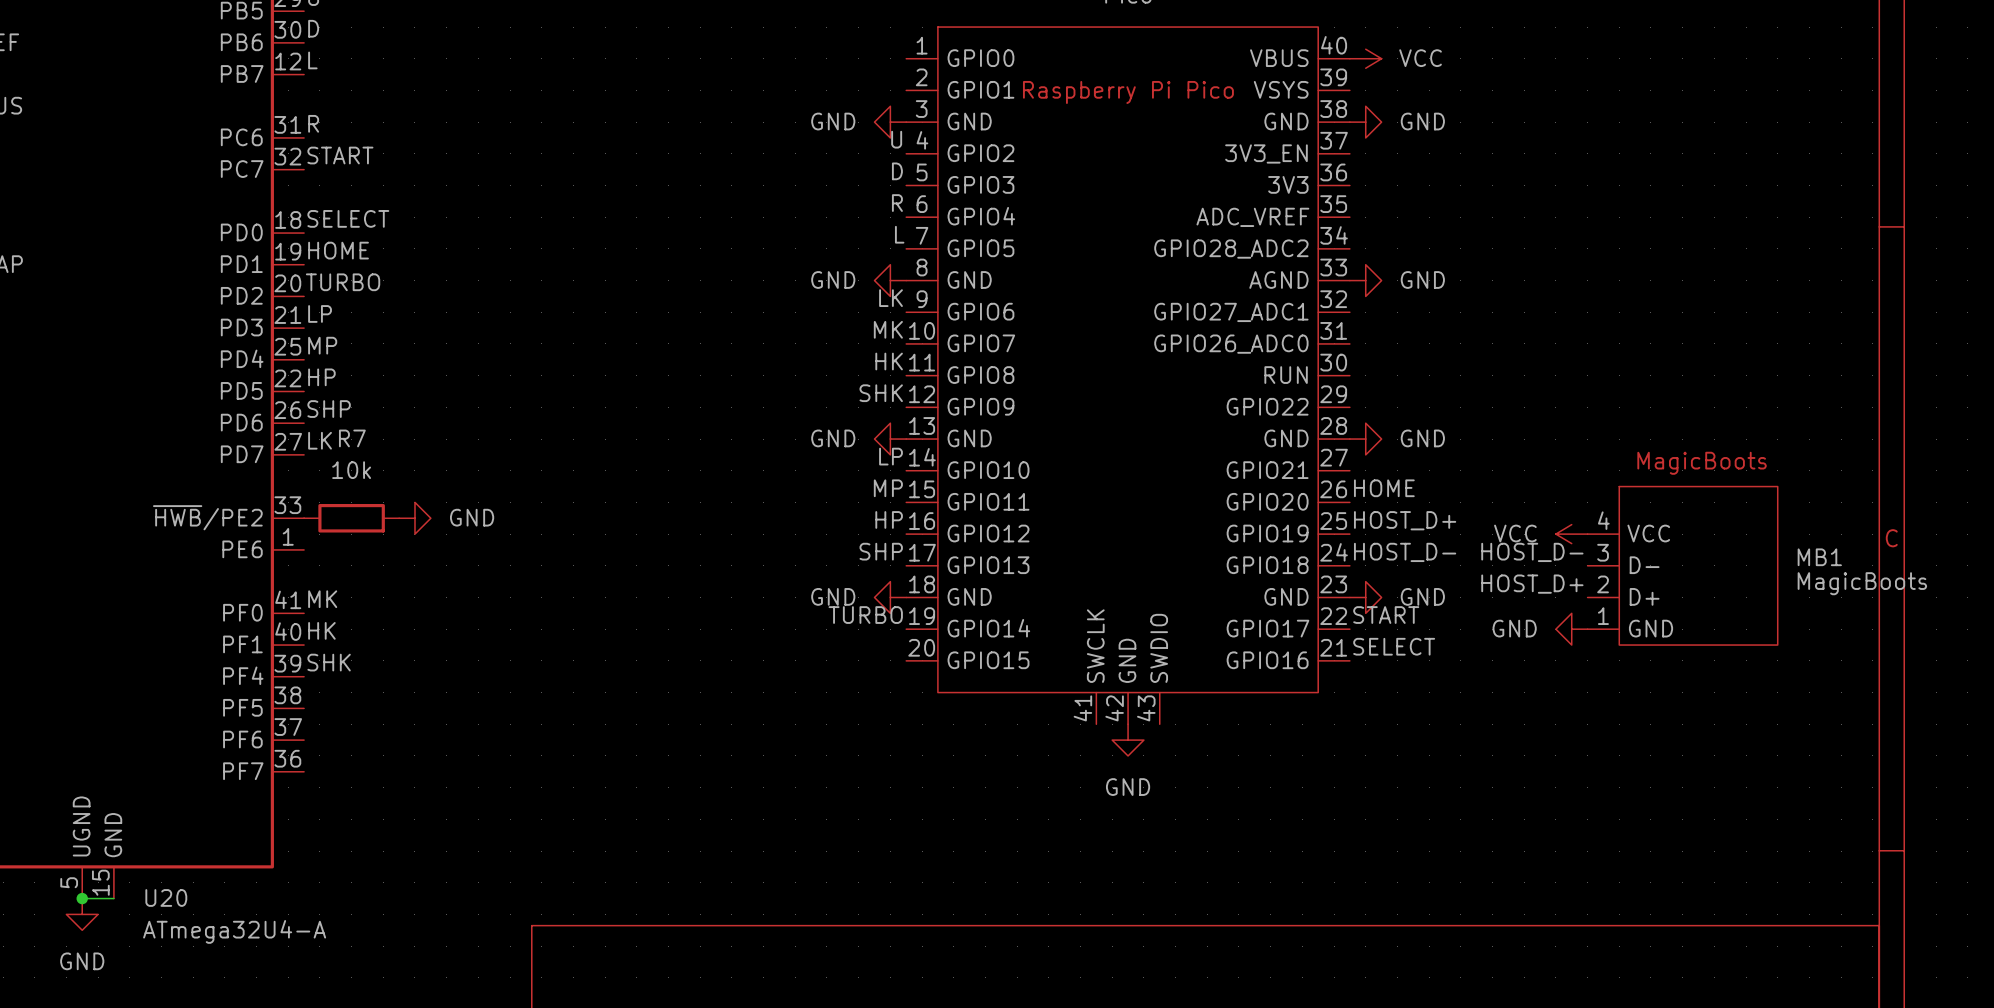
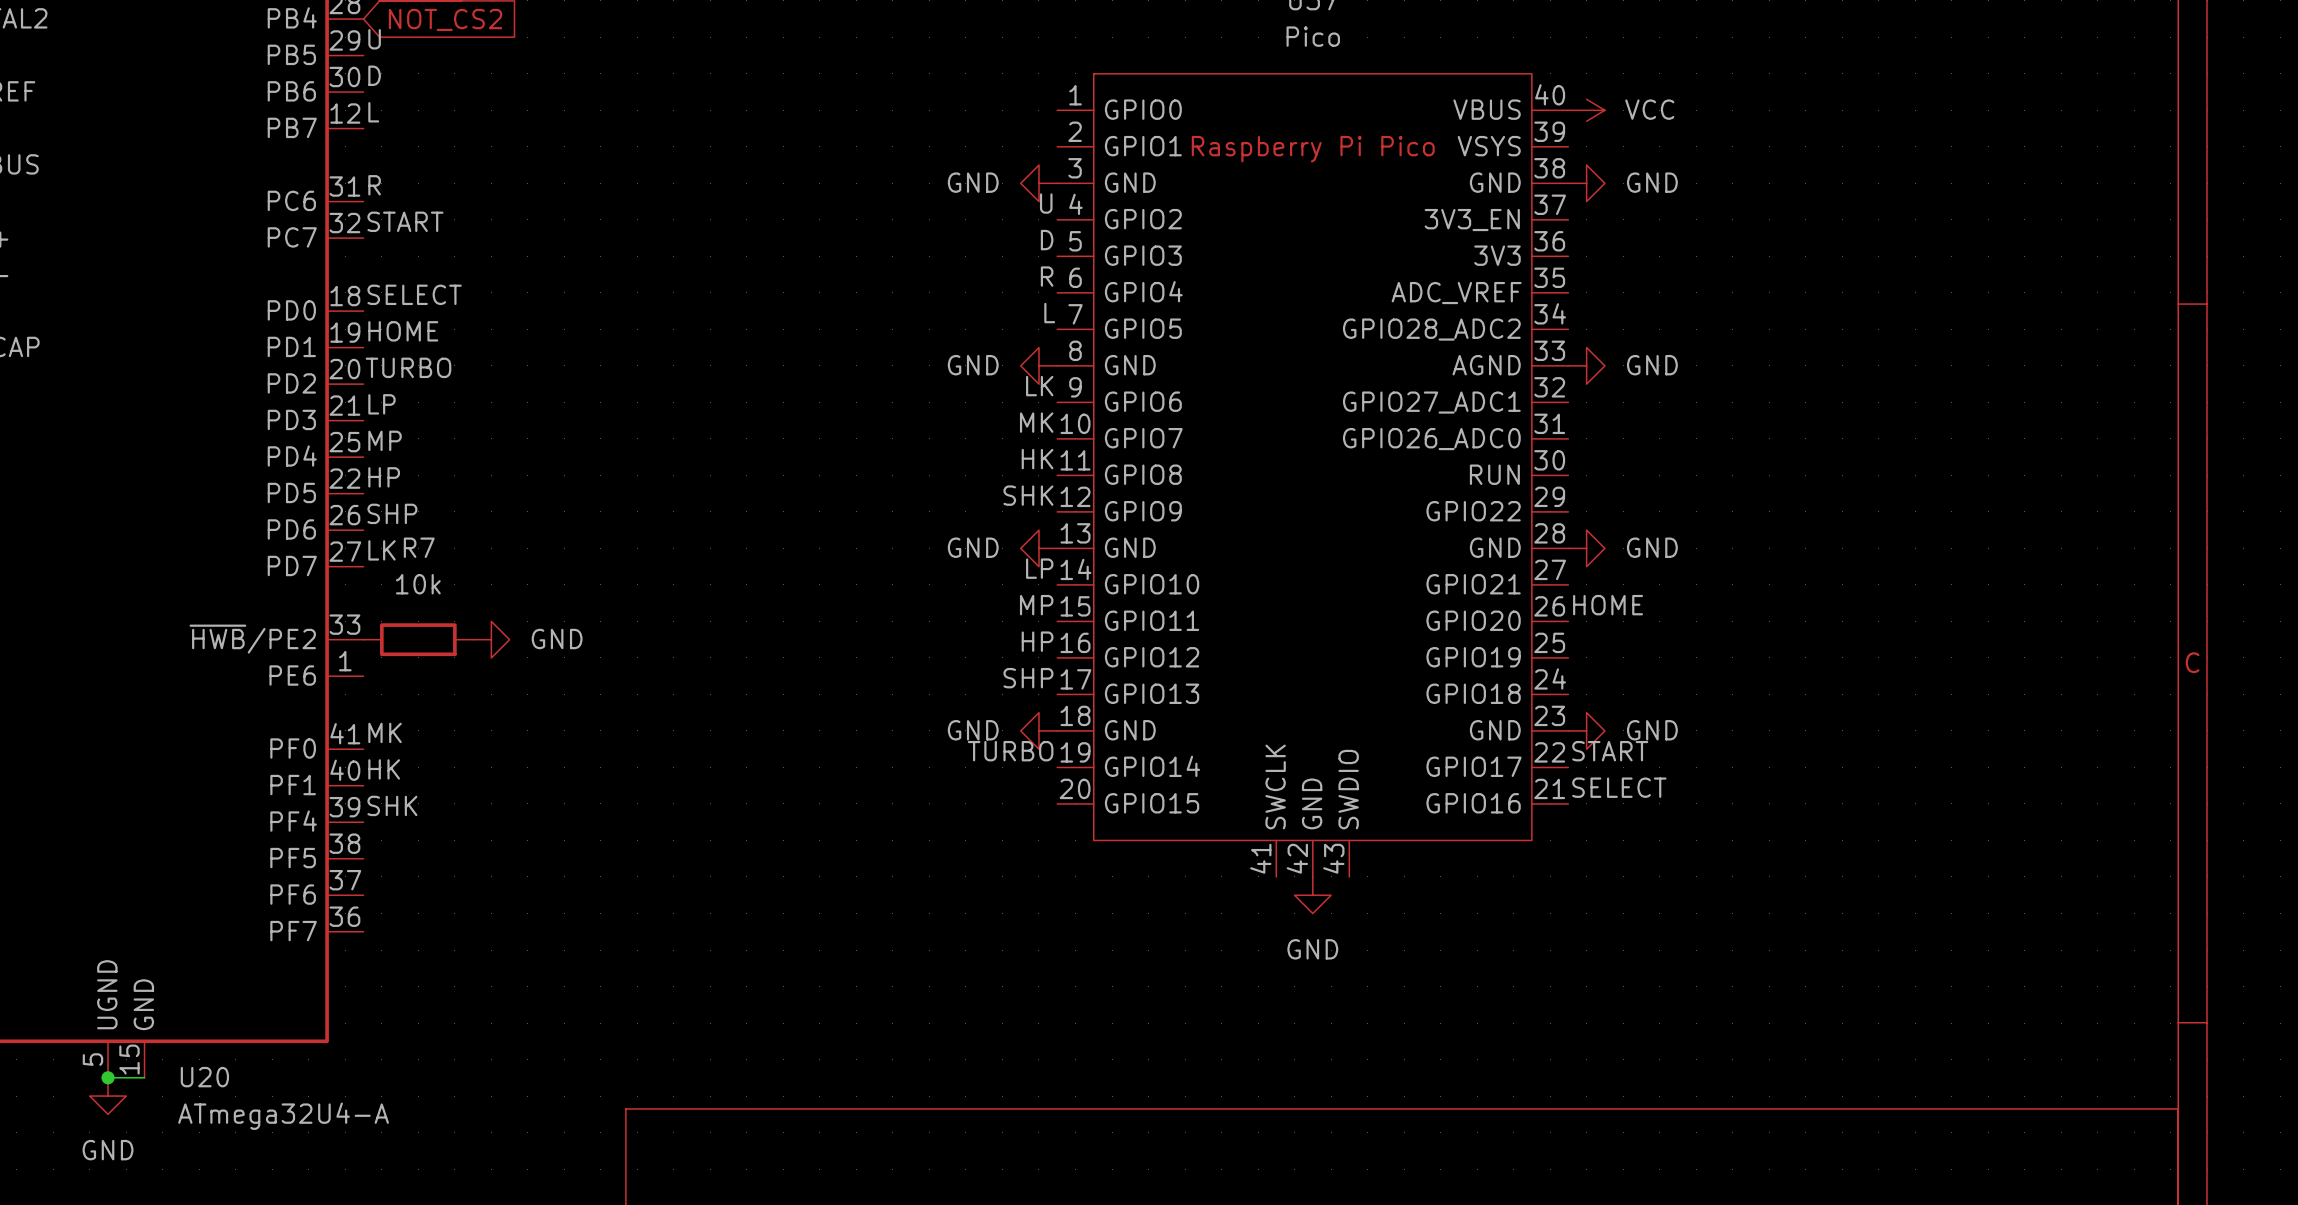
label: HOST_D+ (1405, 520) -> none
power symbol: VCC (1571, 534) -> none
label: HOST_D- (1405, 552) -> none
label: HOST_D- (1532, 552) -> none
MB1: MagicBoots (1682, 565) -> none
label: HOST_D+ (1532, 584) -> none
power symbol: GND (1571, 629) -> none

